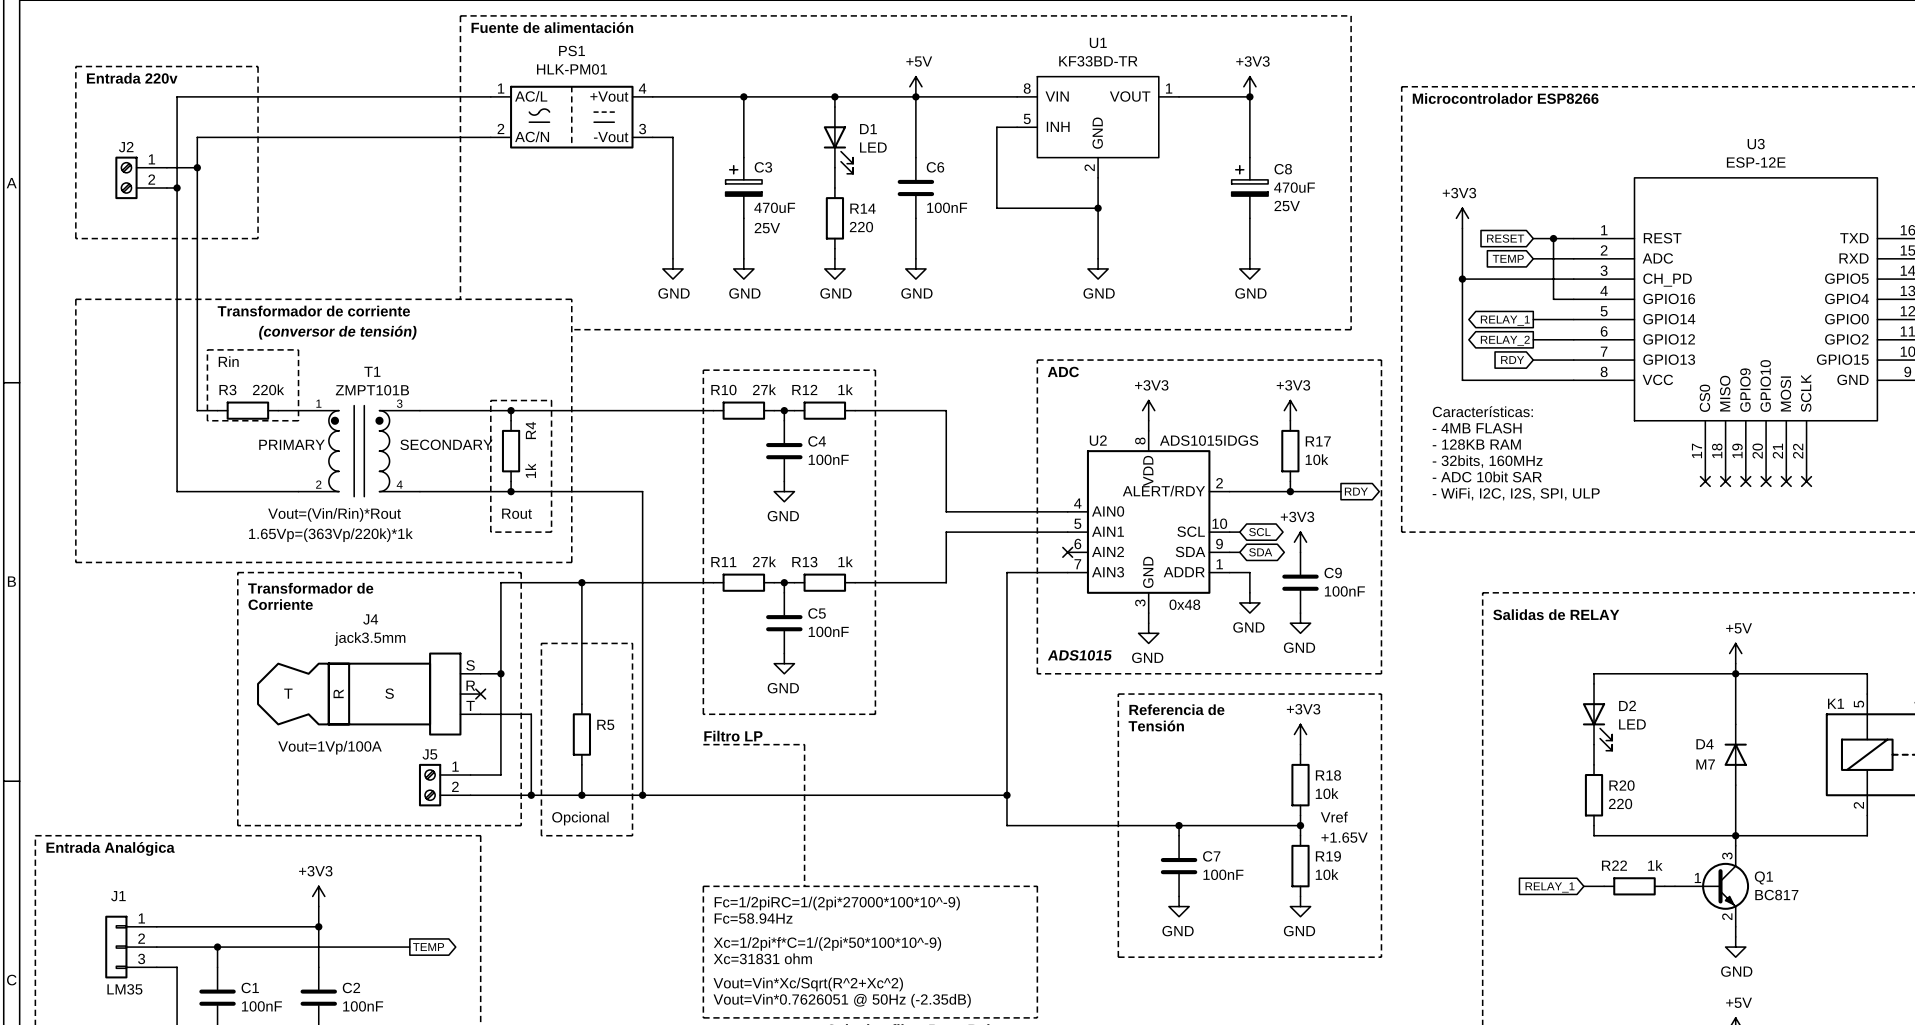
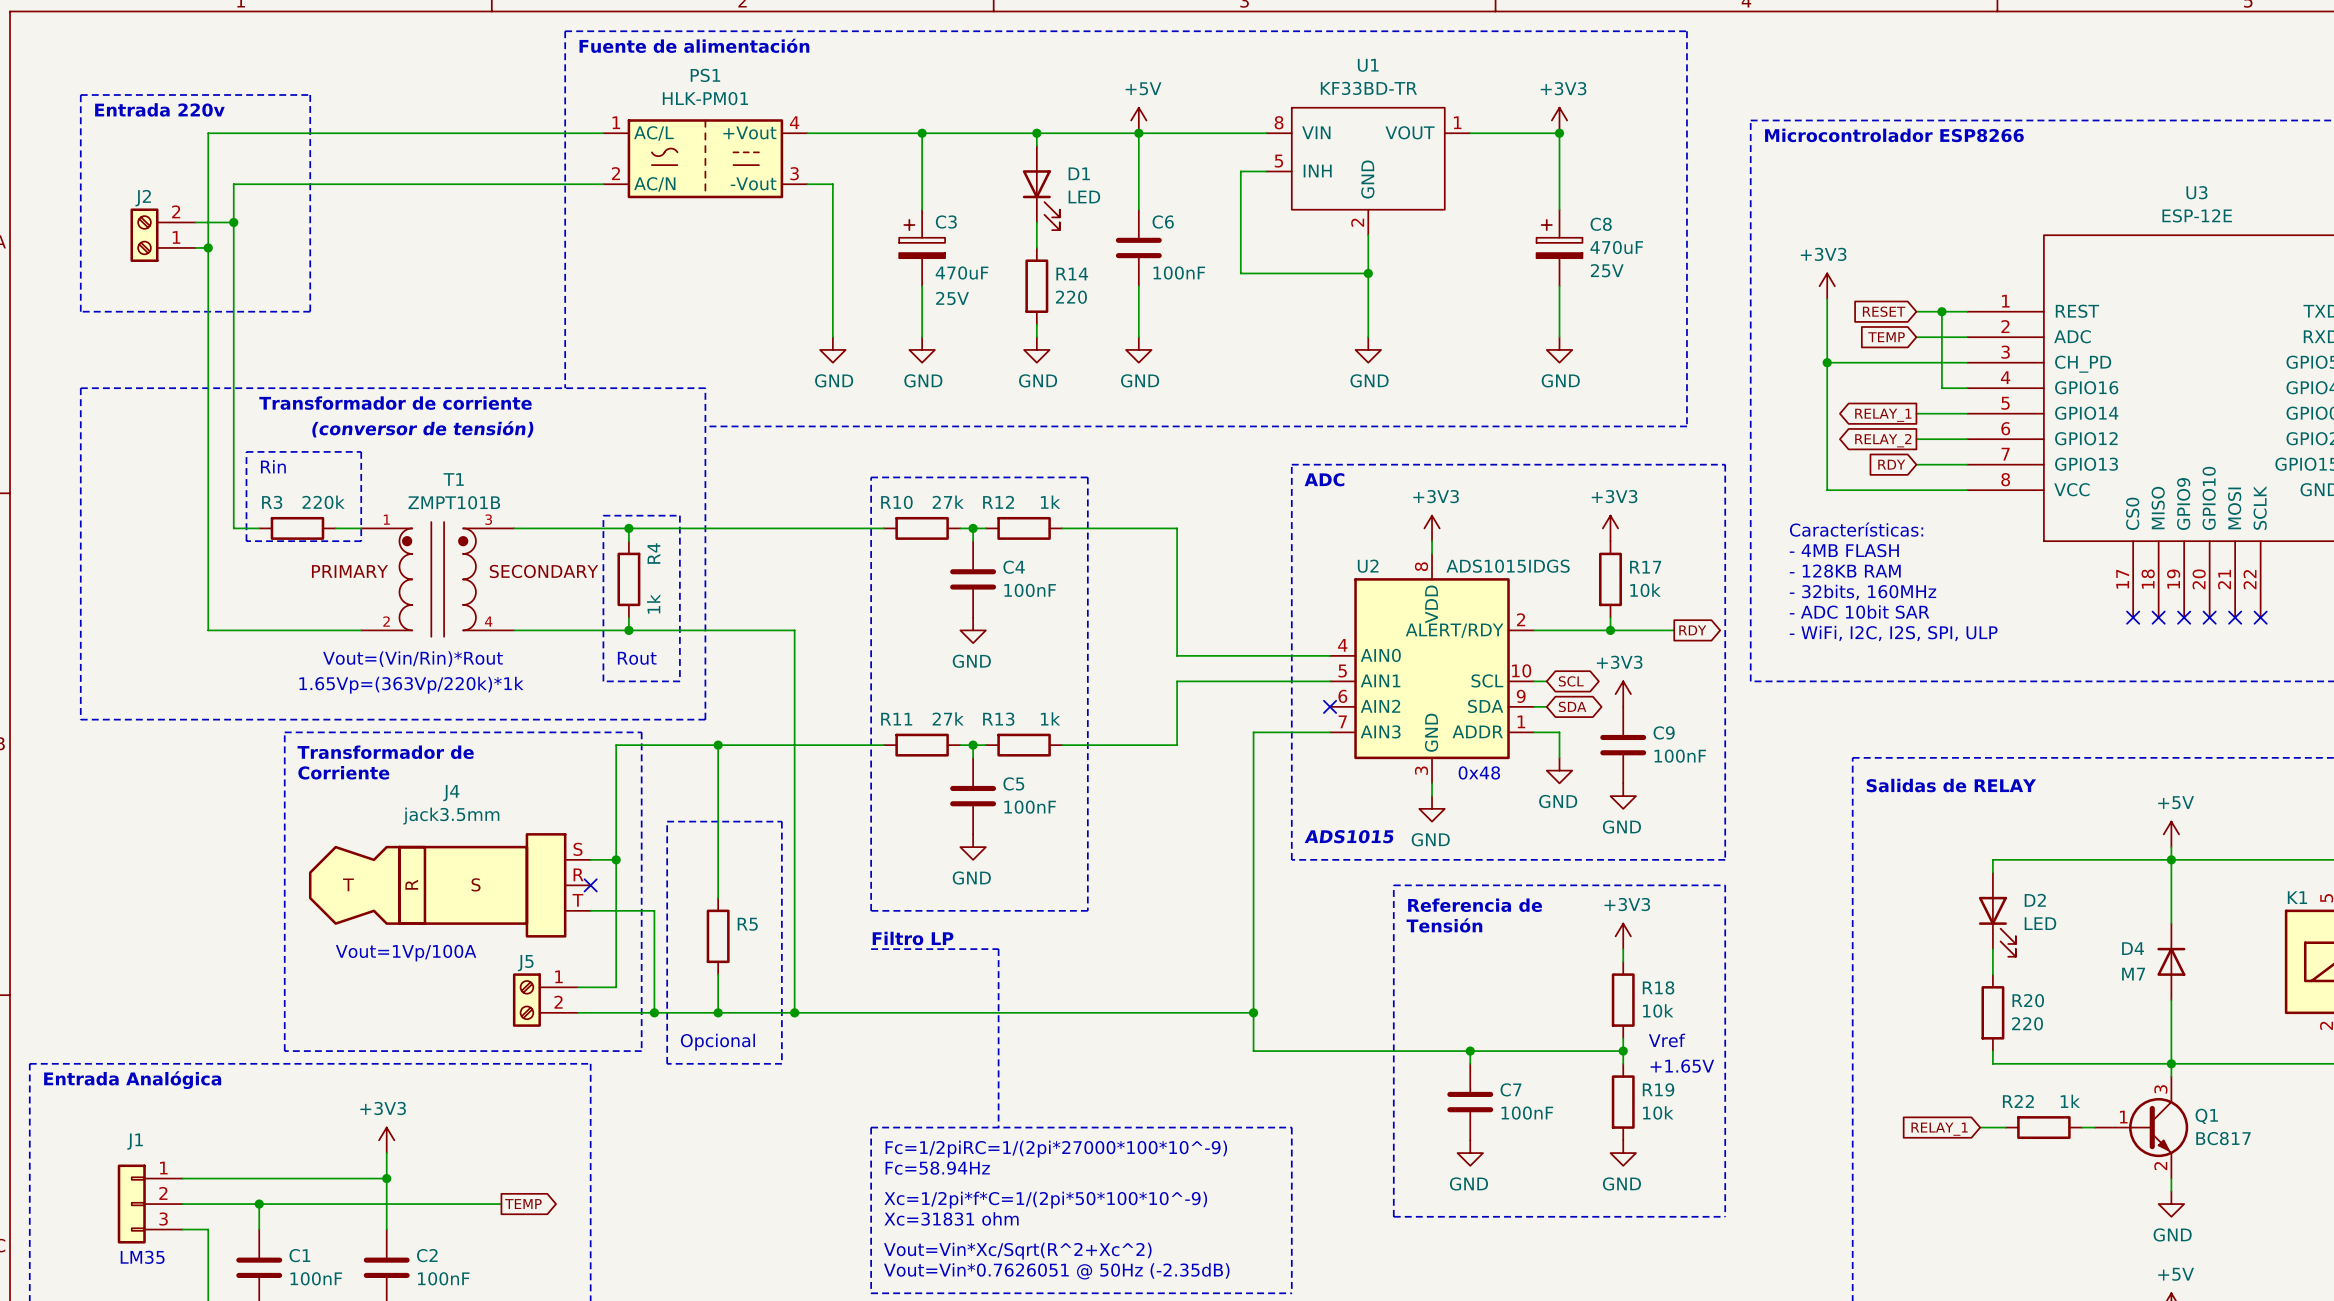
J2 flip: as is (126, 177) -> up-down (144, 235)

